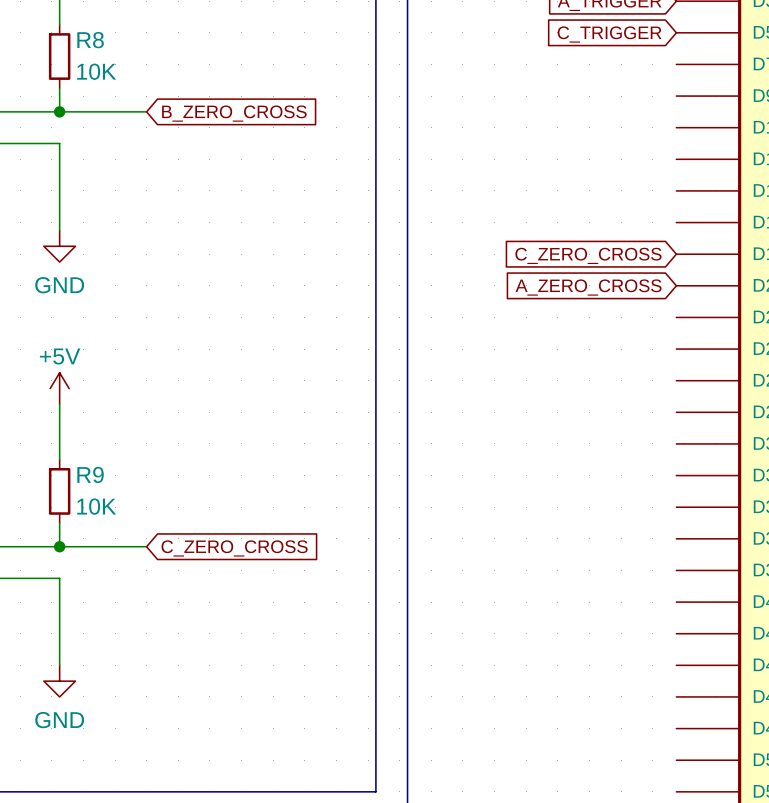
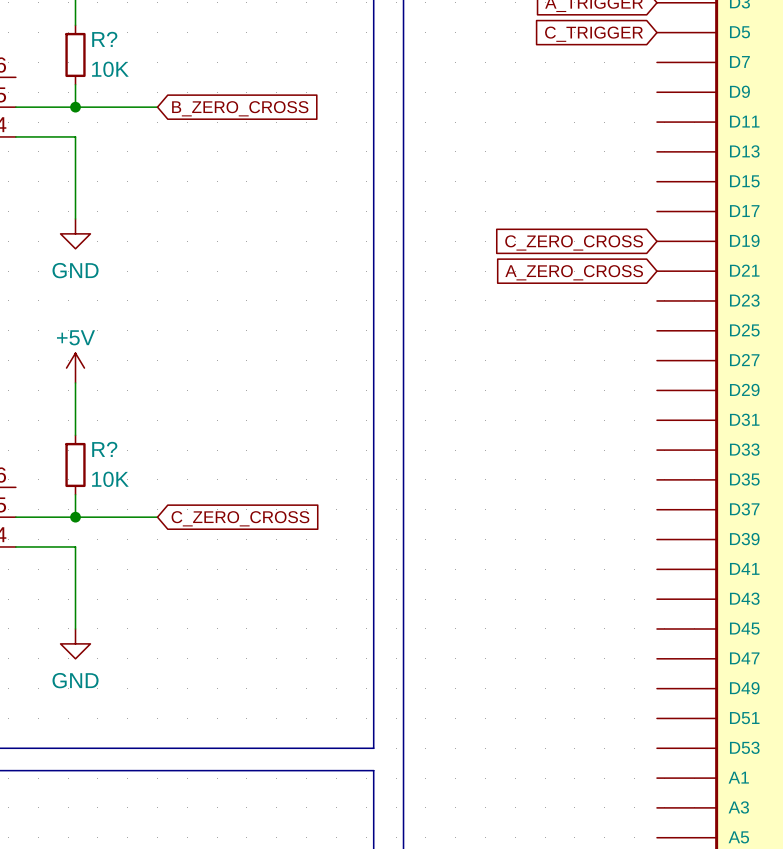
R8 name: R8 (90, 40) -> R? (104, 39)
R9 name: R9 (90, 474) -> R? (104, 449)

